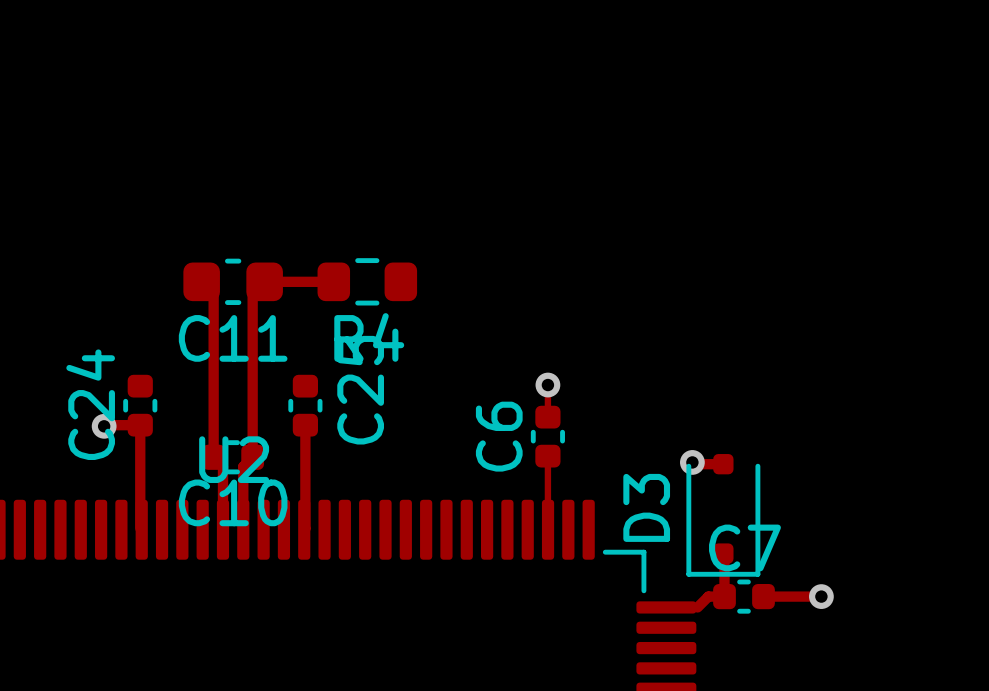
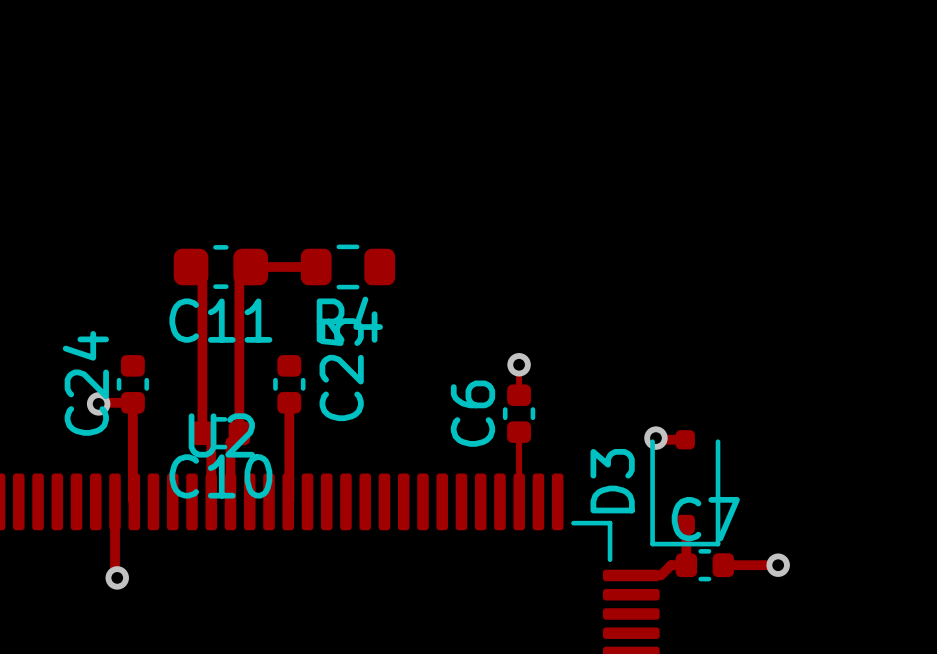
track: none -> (115, 501) (115, 575) (117, 577)
via: none -> (117, 577)

